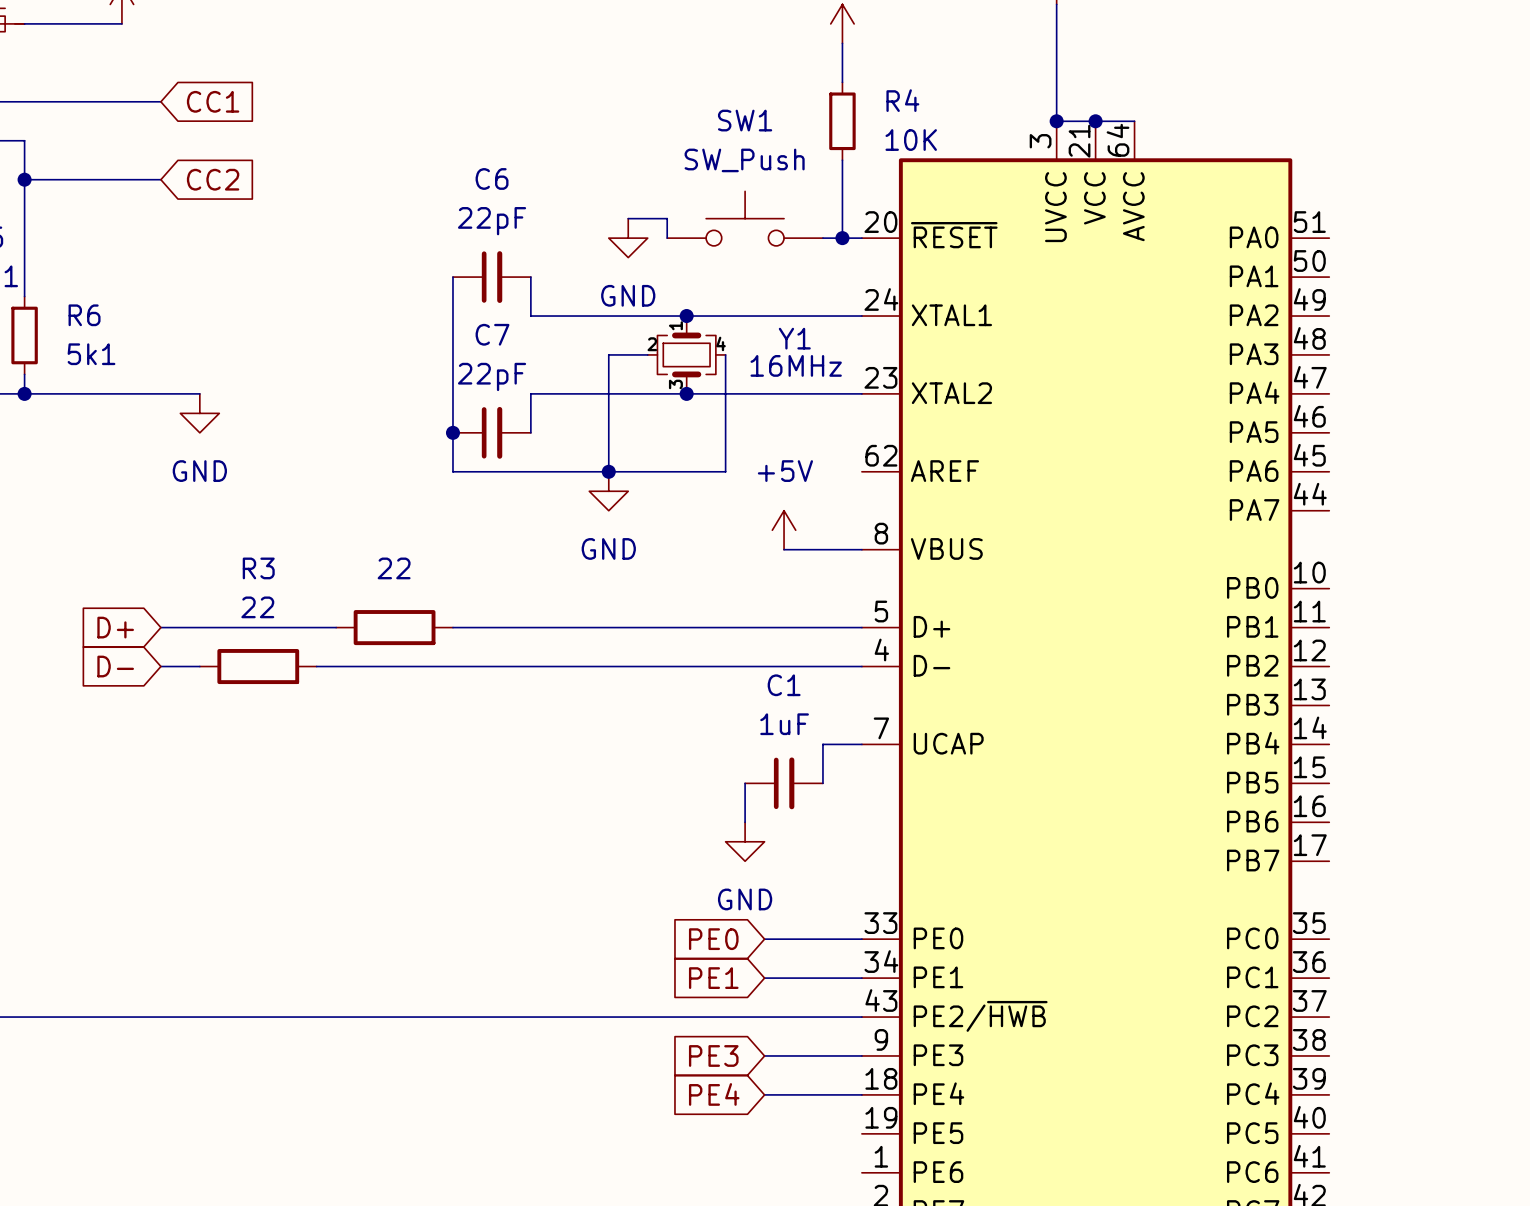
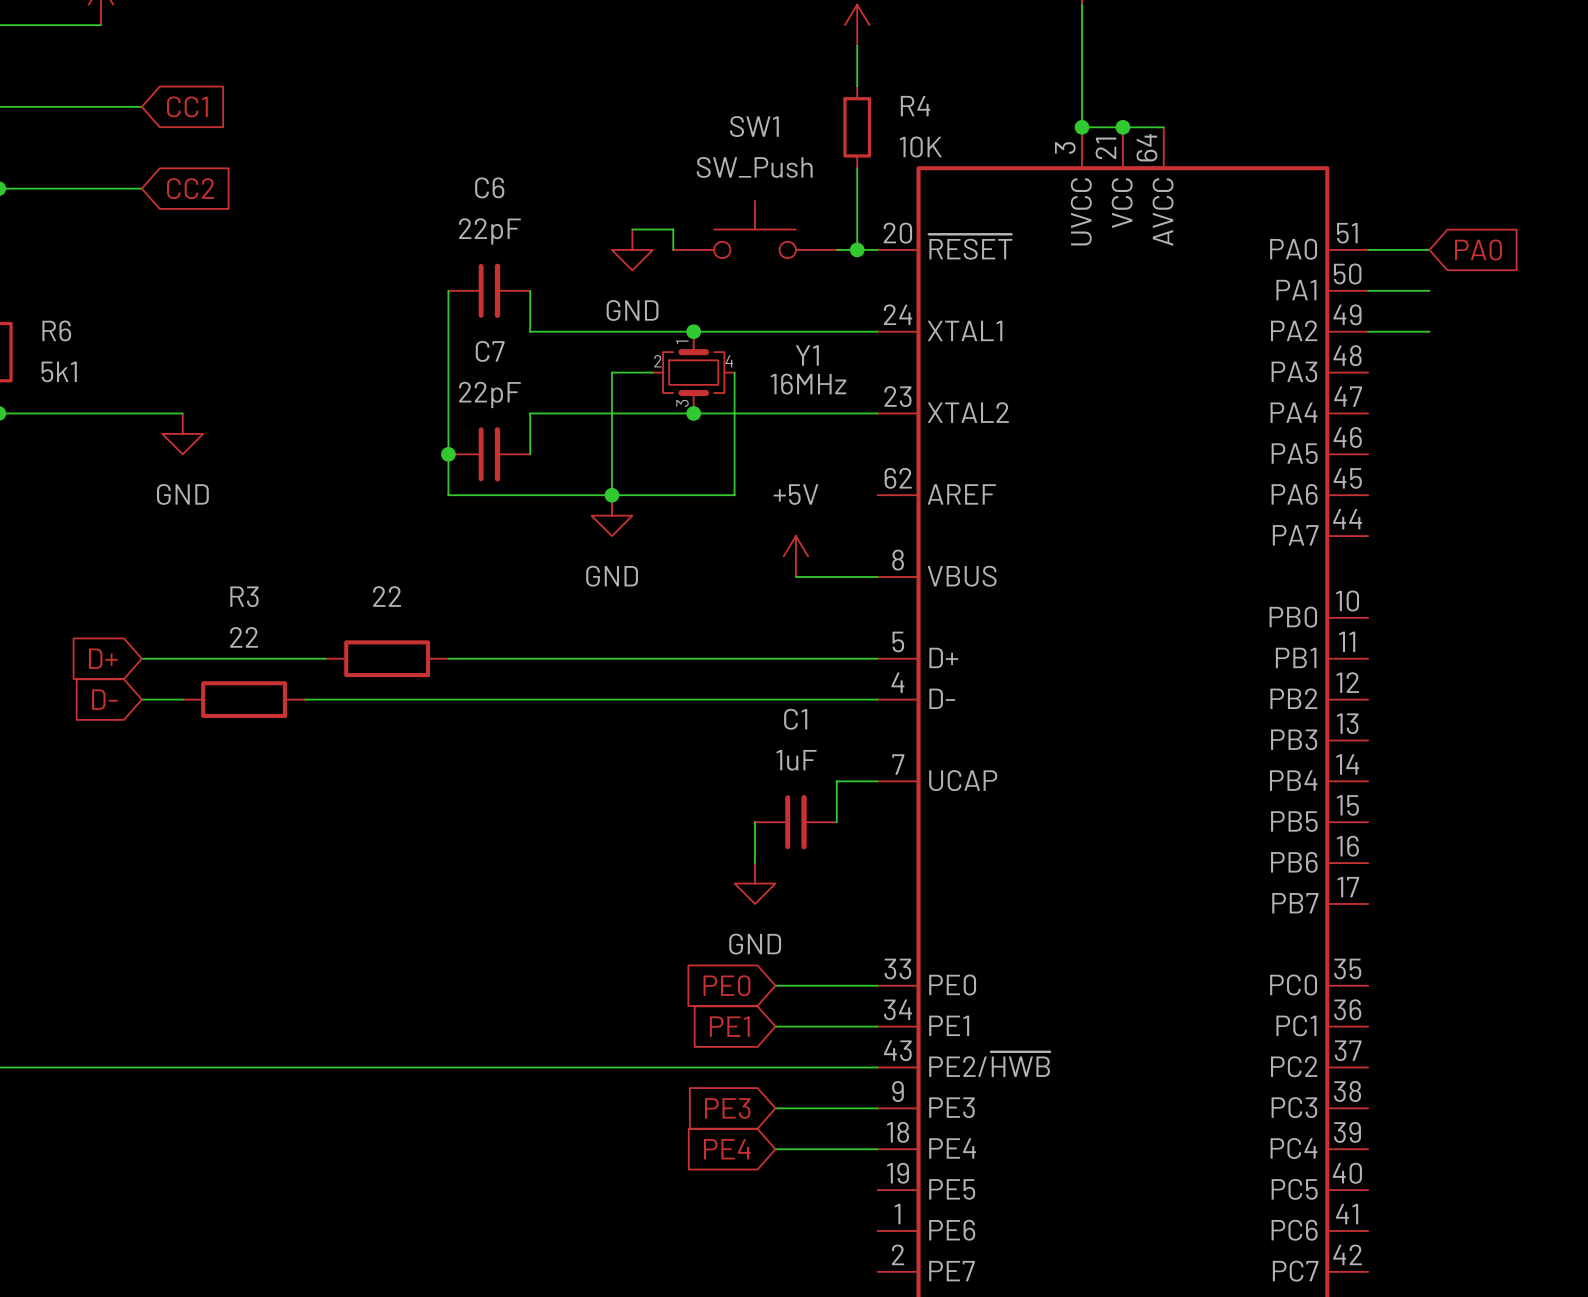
wire: none -> (1368, 249) (1429, 249)
global label: none -> PA0 (1478, 249)
wire: none -> (1368, 290) (1429, 290)
wire: none -> (1368, 331) (1429, 331)

